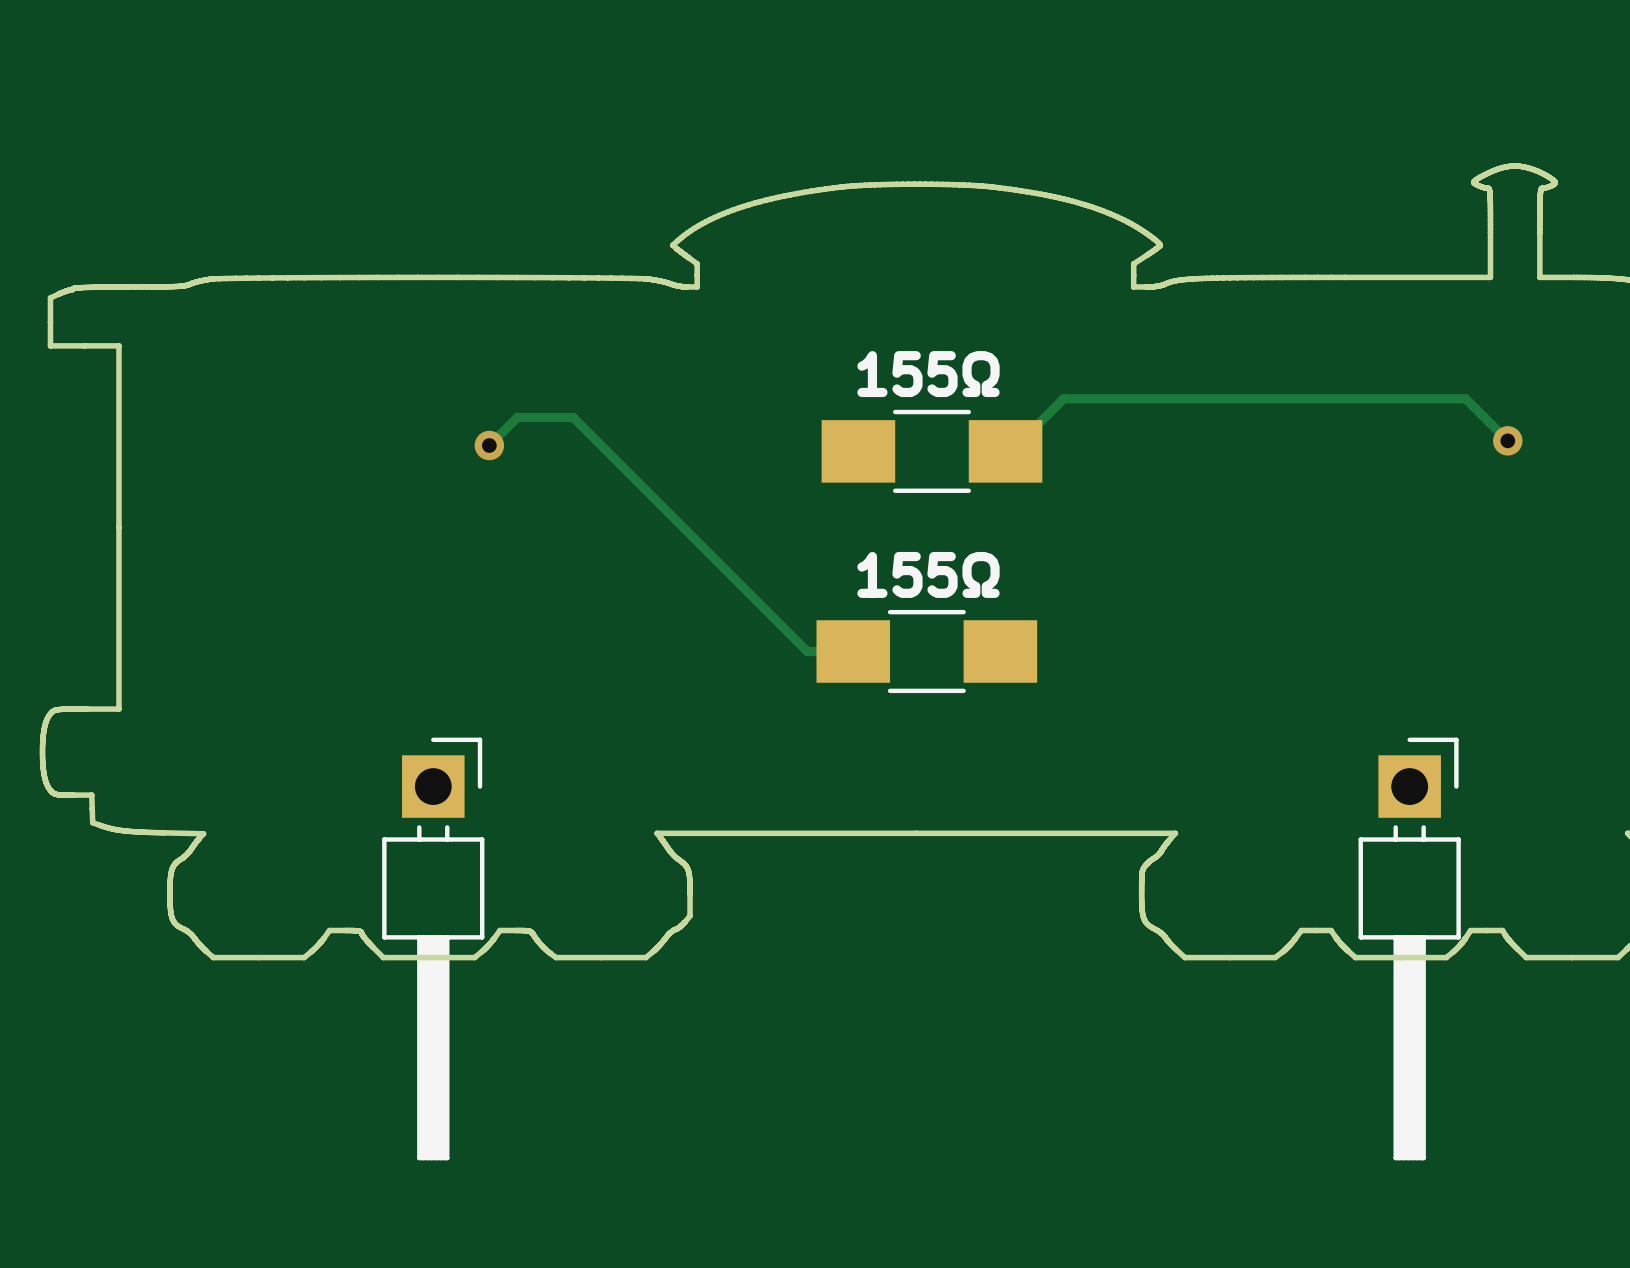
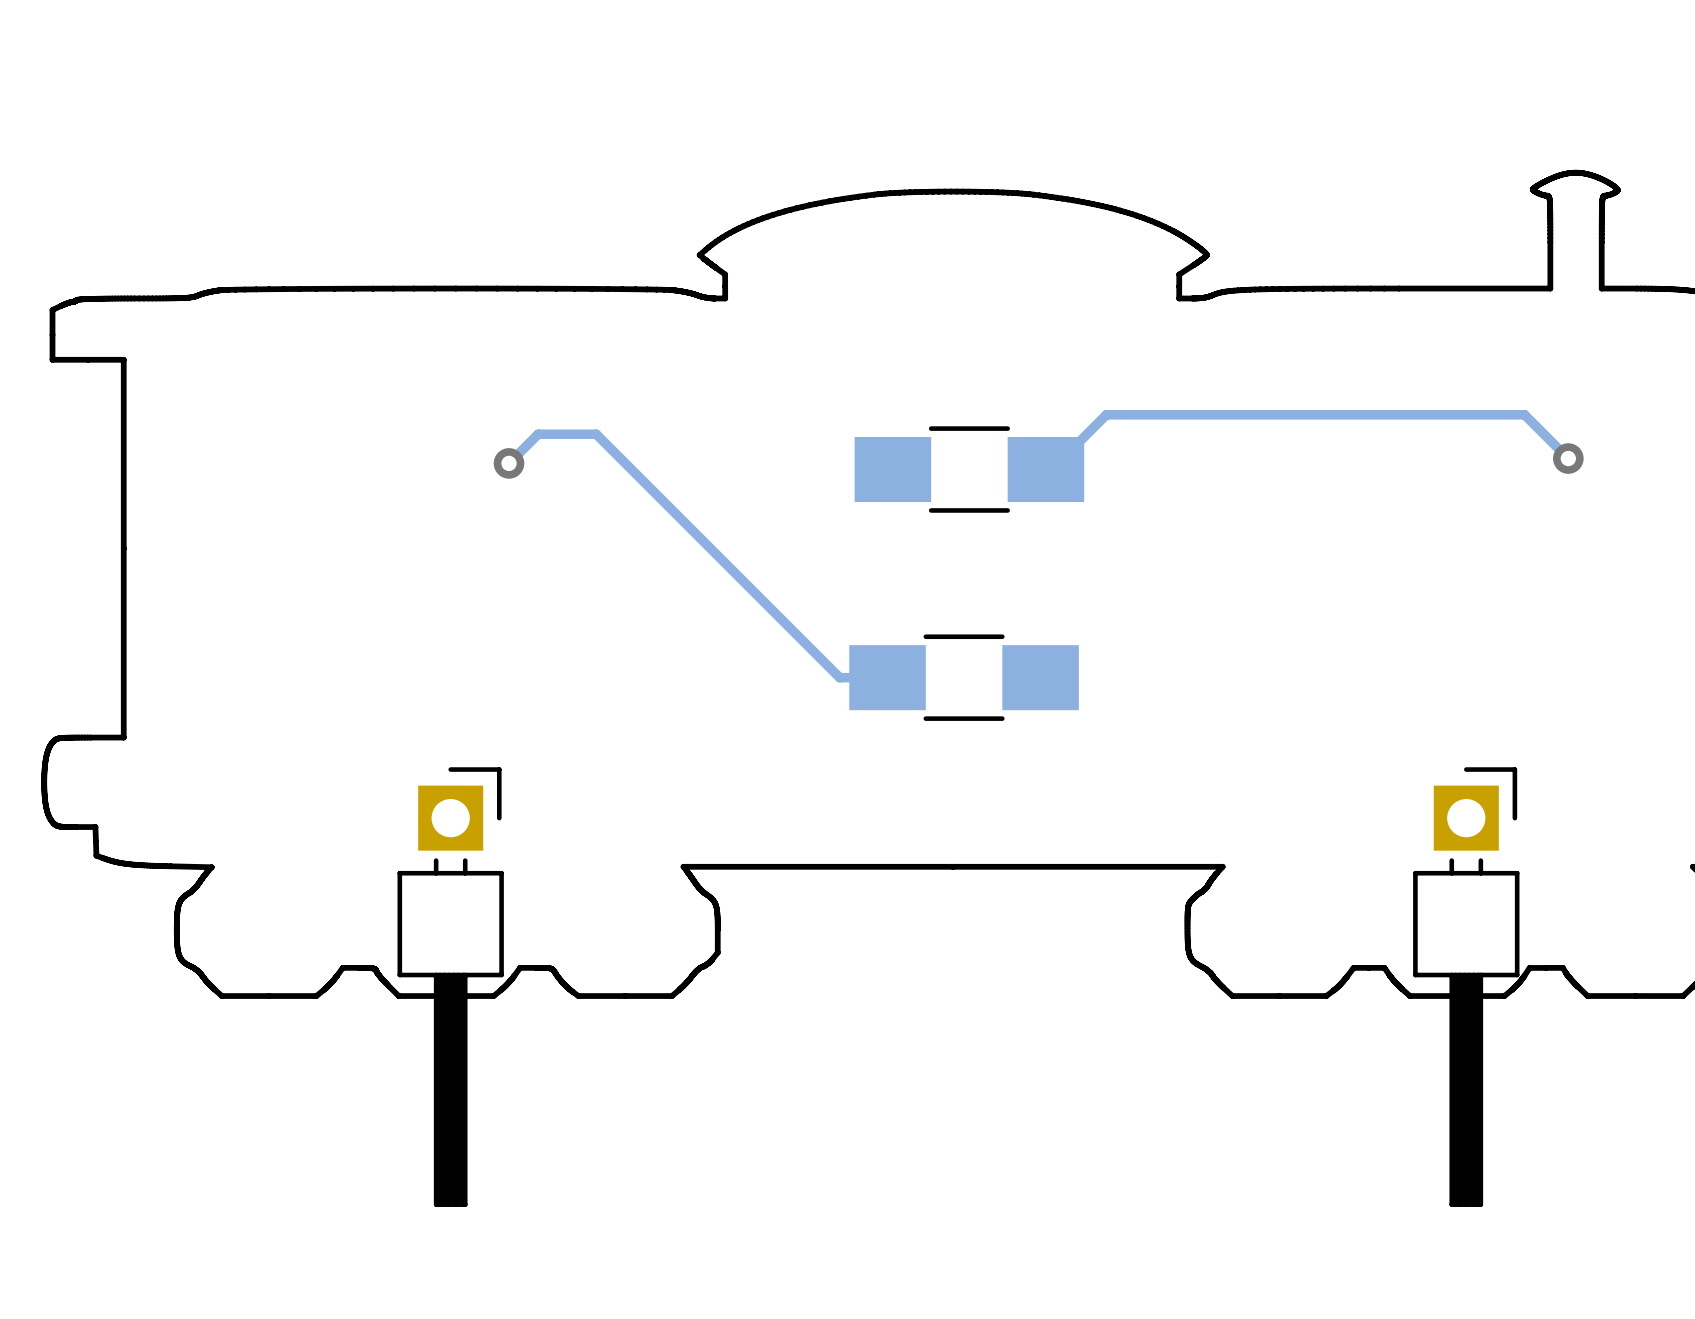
text: 155Ω (928, 374) -> none
text: 155Ω (928, 574) -> none

